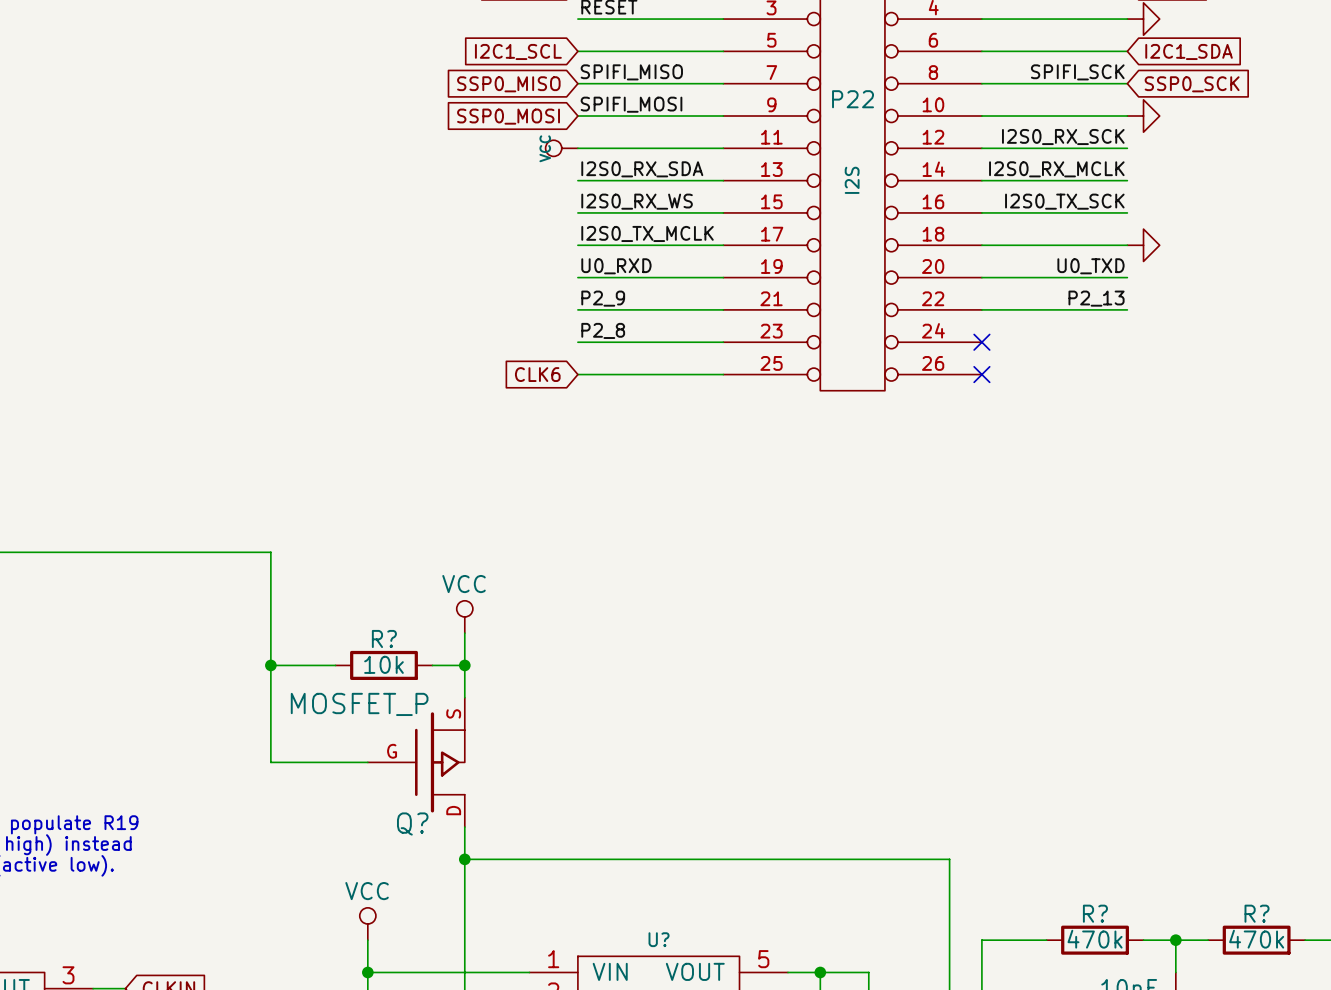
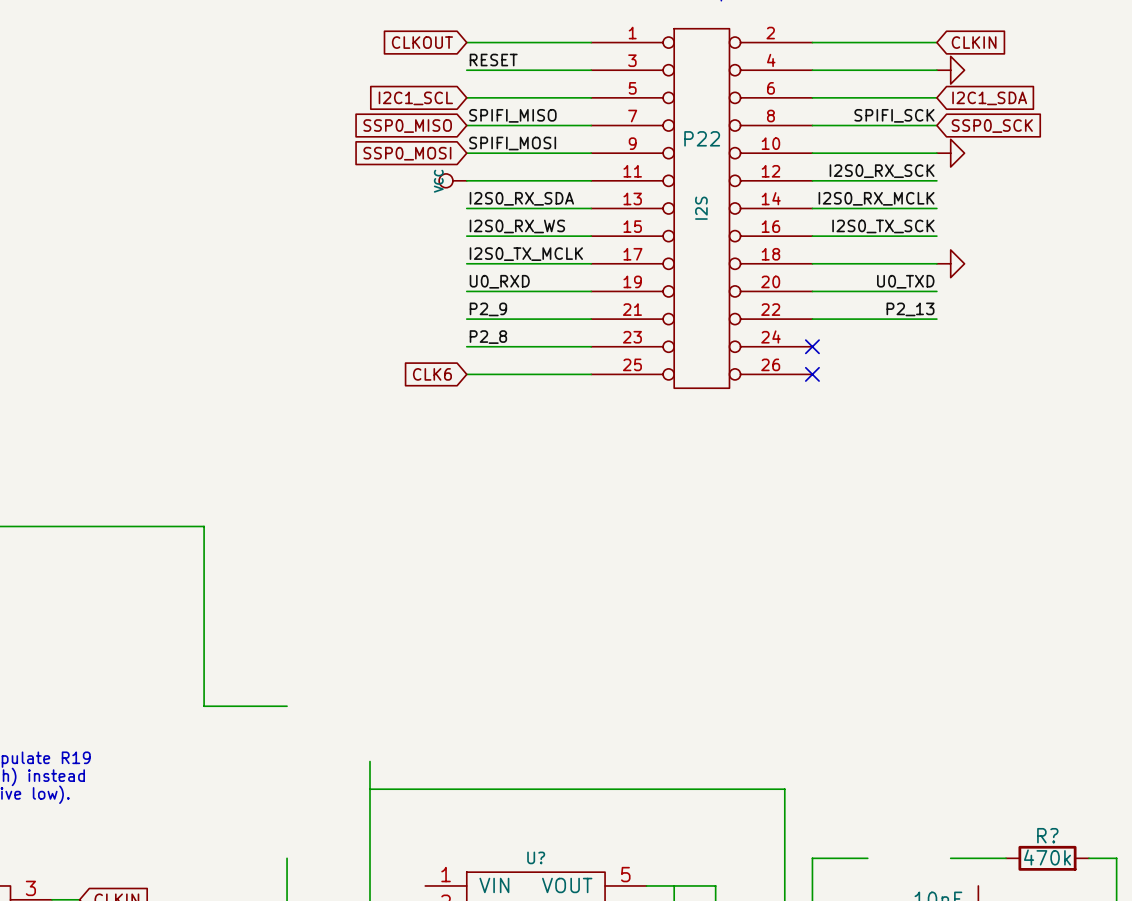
power symbol: VCC (464, 616) -> none
wire: (464, 633) (464, 697) -> none
wire: (270, 665) (335, 665) -> none
junction: (270, 665) -> none
R?: 10k (383, 665) -> none
wire: (432, 665) (464, 665) -> none
junction: (464, 665) -> none
Q?: MOSFET_P (416, 762) -> none
junction: (464, 859) -> none
power symbol: VCC (367, 924) -> none
R?: 470k (1095, 940) -> none
wire: (1175, 940) (1175, 972) -> none
junction: (1175, 940) -> none
wire: (367, 972) (529, 972) -> none
junction: (367, 972) -> none
junction: (820, 972) -> none

